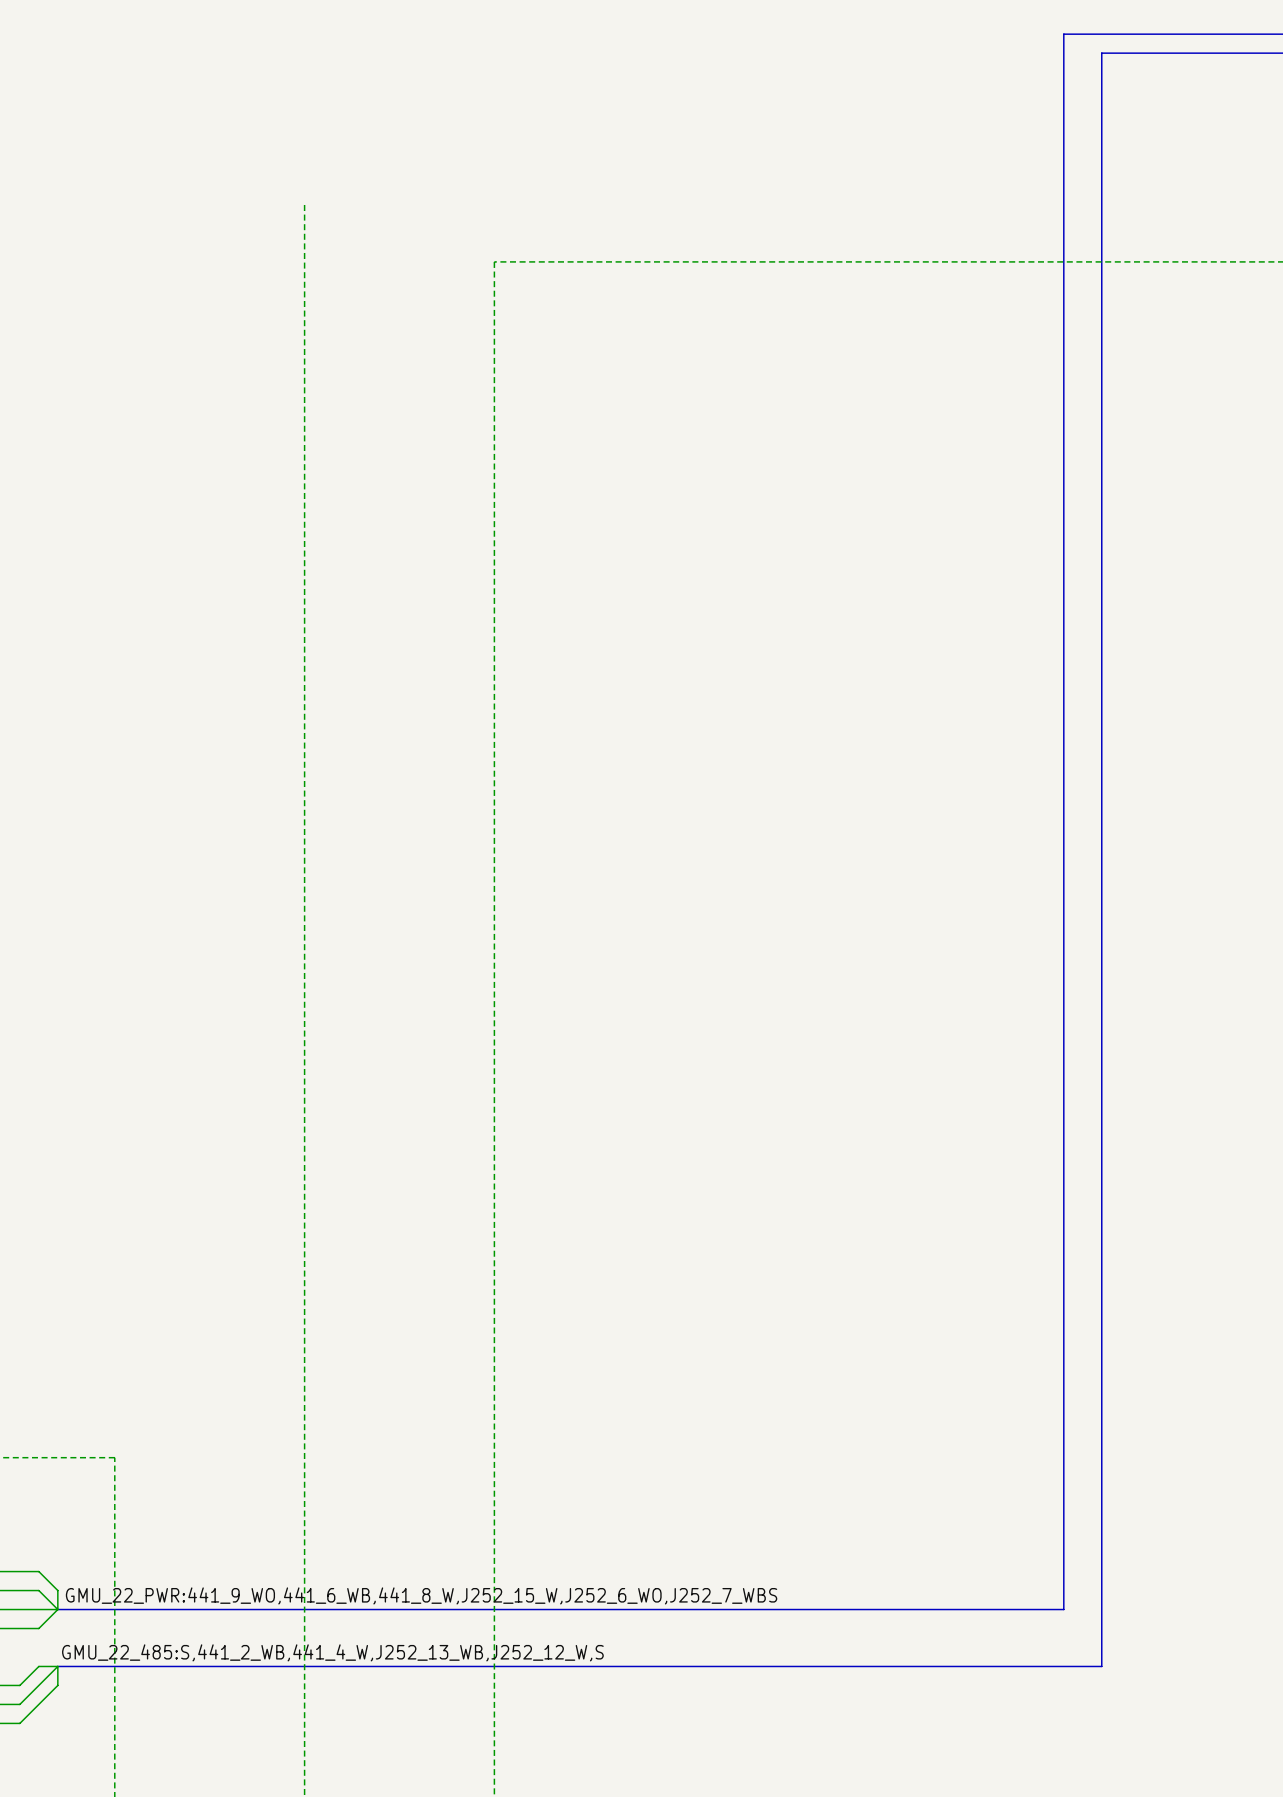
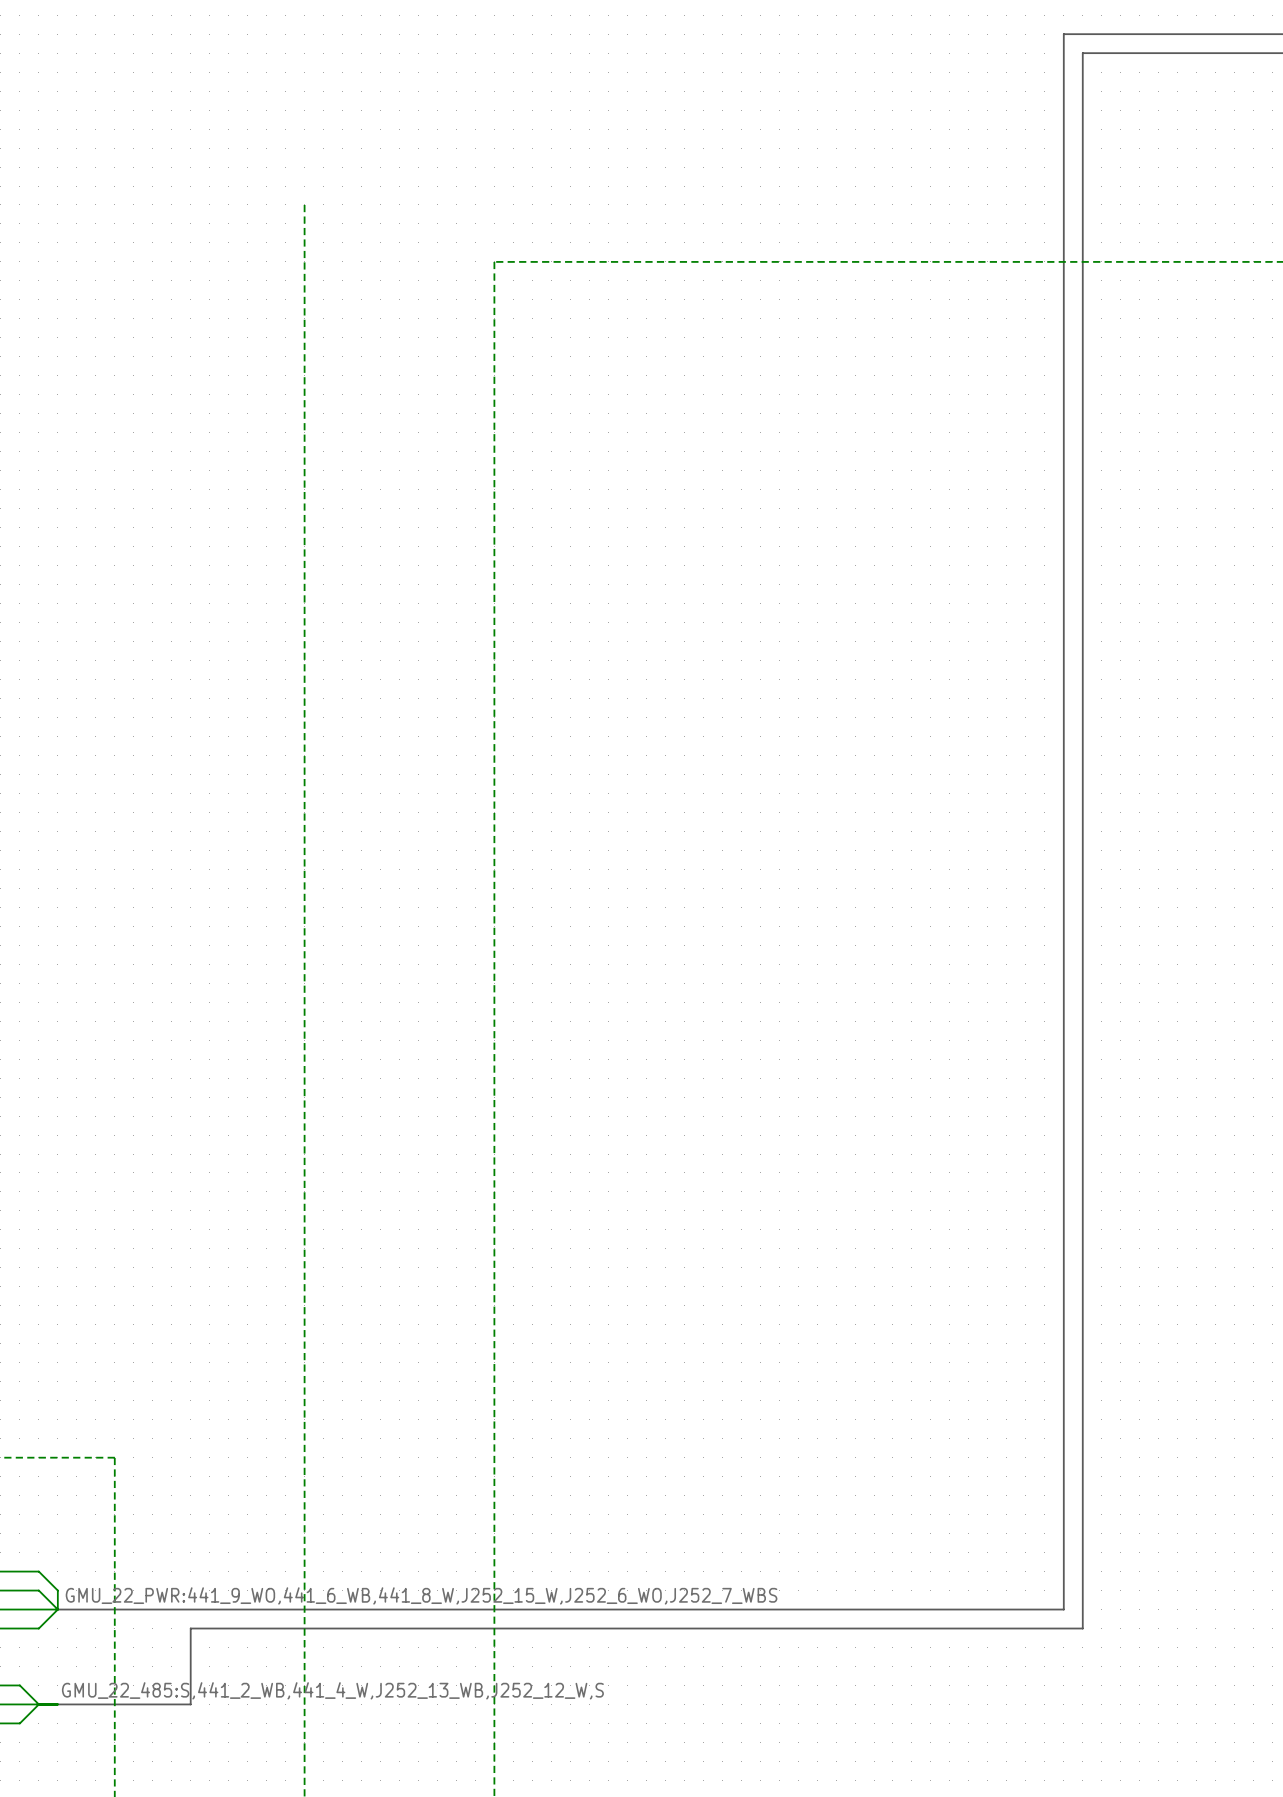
bus: (1101, 53) (1101, 1666) (57, 1666) -> (1101, 53) (1082, 53) (1082, 1628) (190, 1628) (190, 1704) (57, 1704)
label position: GMU_22_485:S,441_2_WB,441_4_W,J252_13_WB,J252_12_W,S (332, 1652) -> GMU_22_485:S,441_2_WB,441_4_W,J252_13_WB,J252_12_W,S (332, 1690)
wire: (57, 1666) (19, 1704) -> (57, 1704) (19, 1704)
wire: (57, 1666) (38, 1666) (19, 1685) -> (38, 1704) (19, 1685)
wire: (57, 1666) (57, 1685) (38, 1704) -> none

